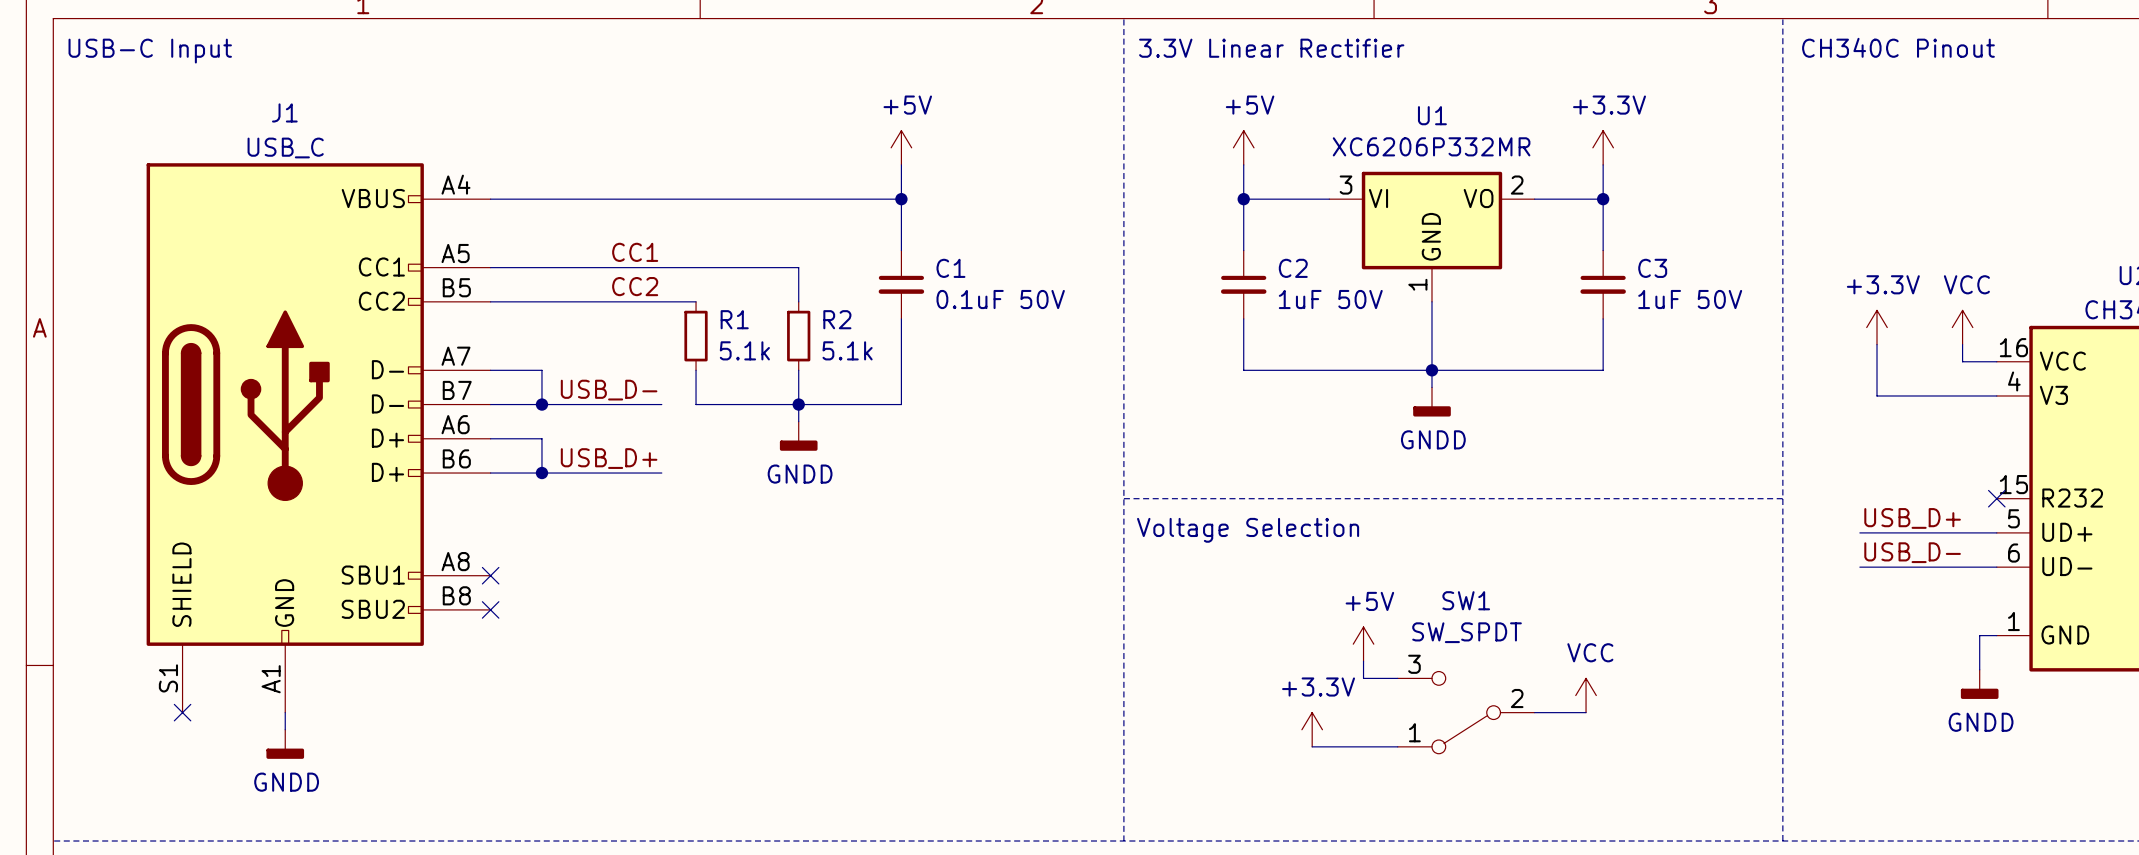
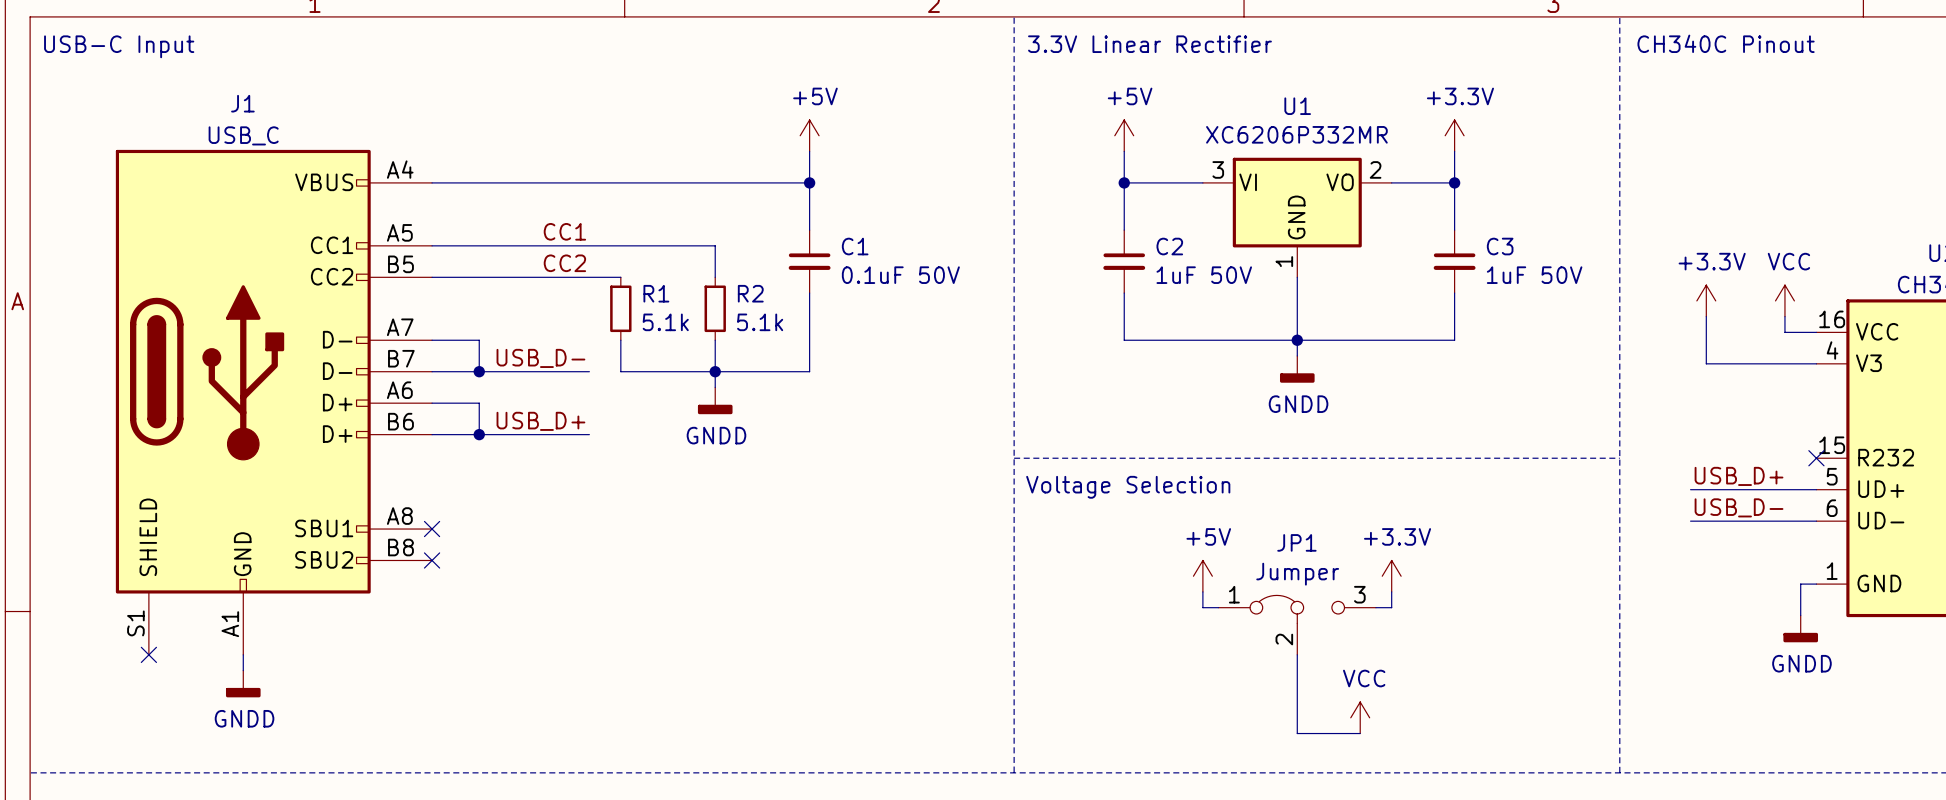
wire: none -> (1202, 591) (1202, 607) (1218, 607)
power symbol position: +5V (1363, 644) -> +5V (1202, 576)
wire: none -> (1391, 591) (1391, 607) (1375, 607)
wire: (1363, 661) (1363, 678) (1397, 678) -> none
JP1: none -> Jumper (1297, 625)
power symbol position: VCC (1586, 695) -> VCC (1360, 717)
wire: none -> (1297, 654) (1297, 733) (1360, 733)
SW1: SW_SPDT (1466, 712) -> none
wire: (1534, 712) (1586, 712) -> none
power symbol position: +3.3V (1312, 729) -> +3.3V (1391, 576)
wire: (1312, 746) (1397, 746) -> none

